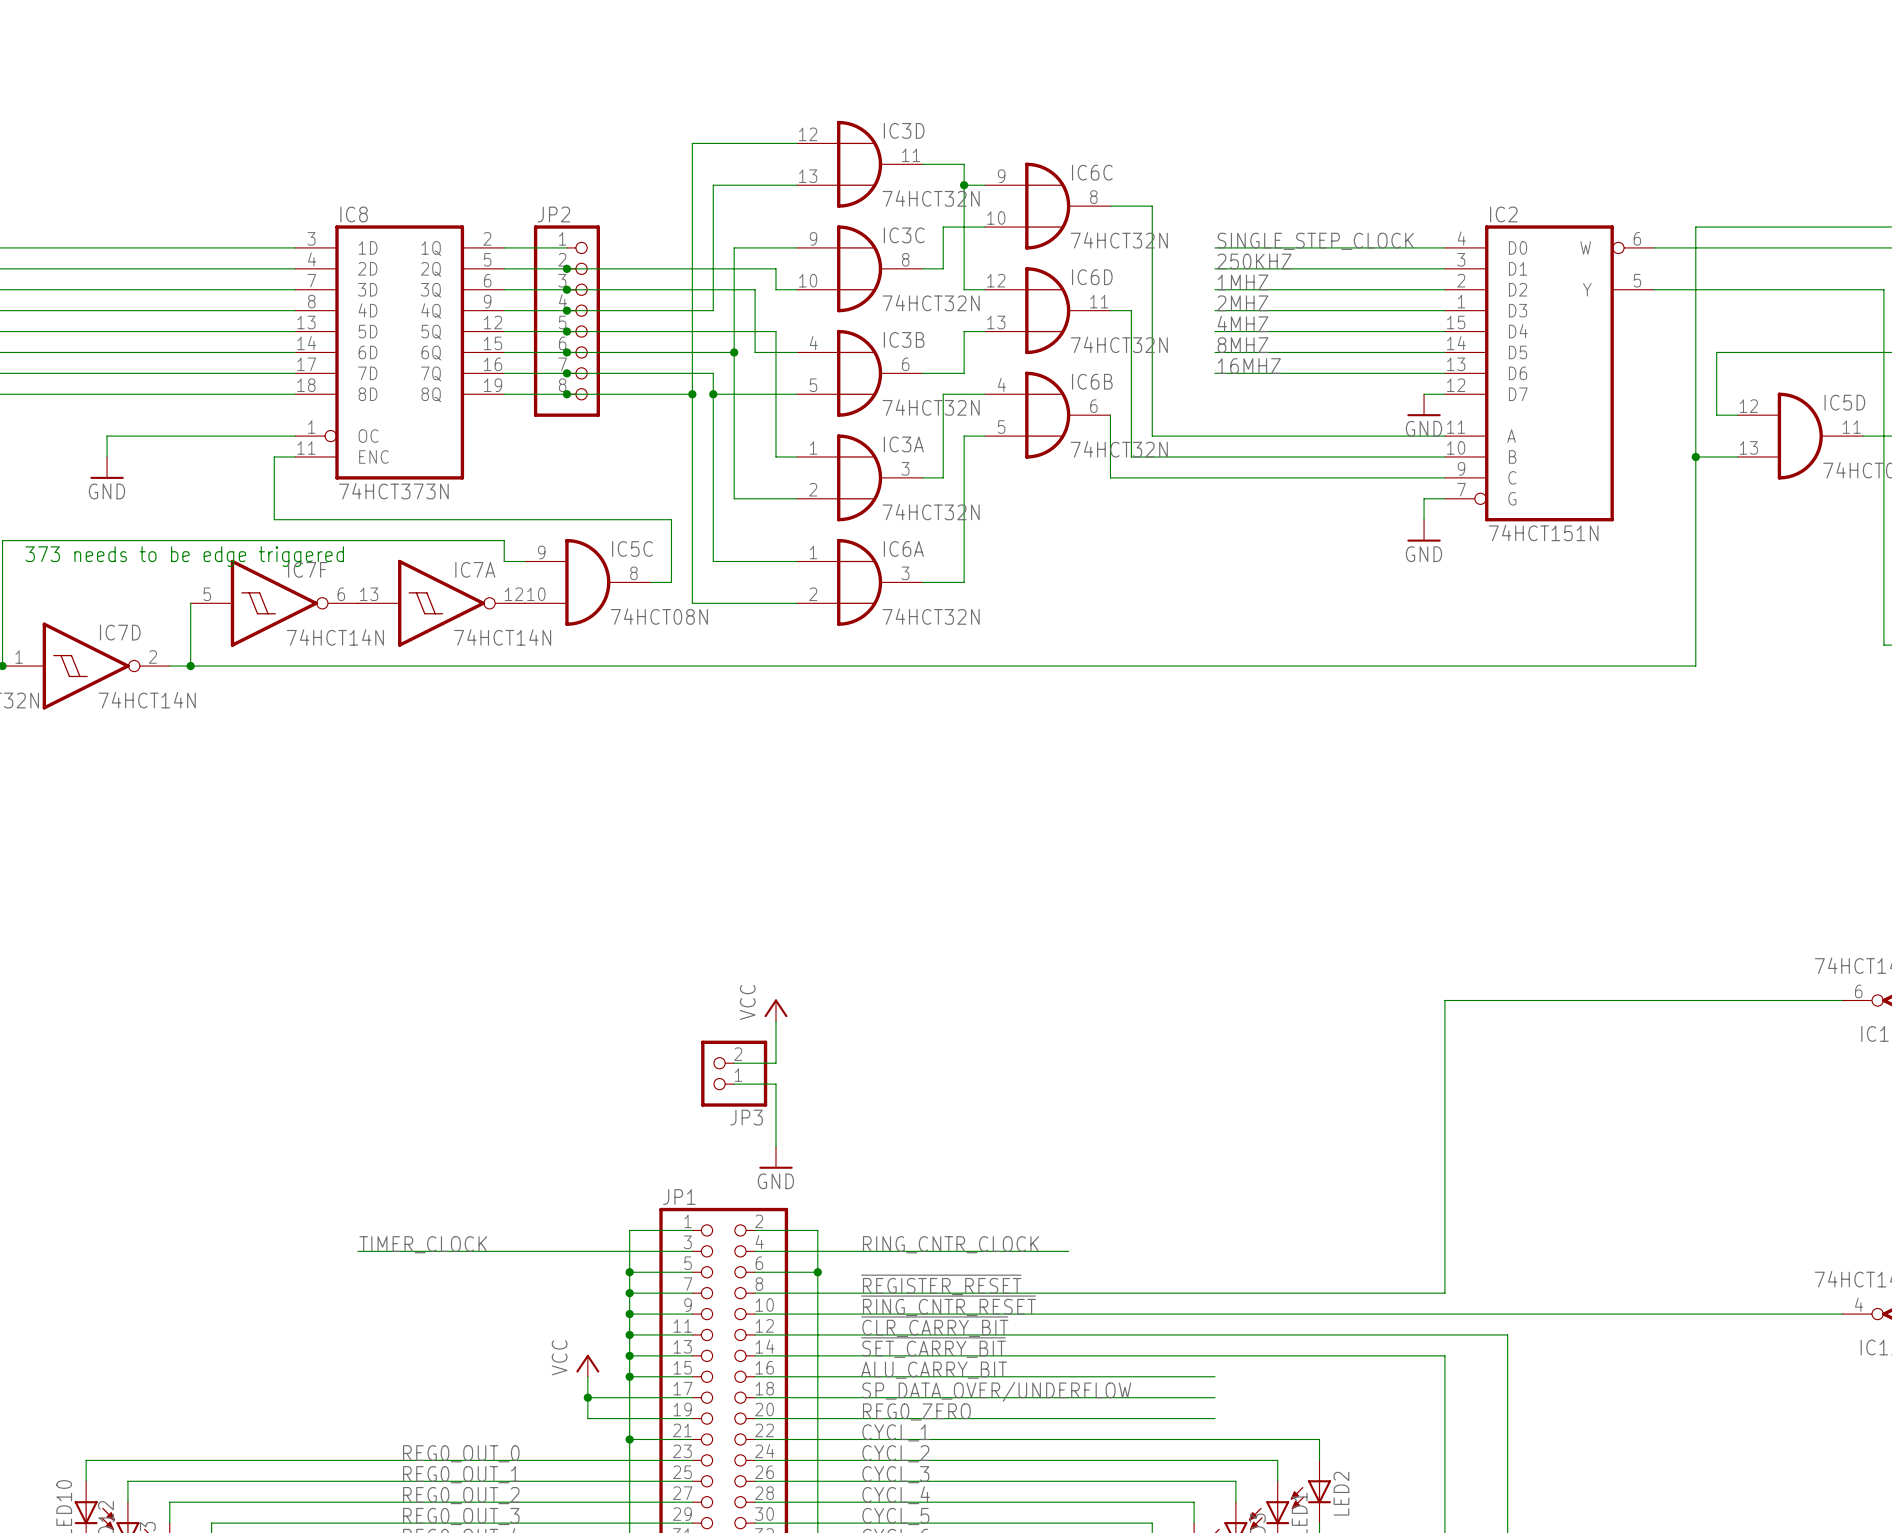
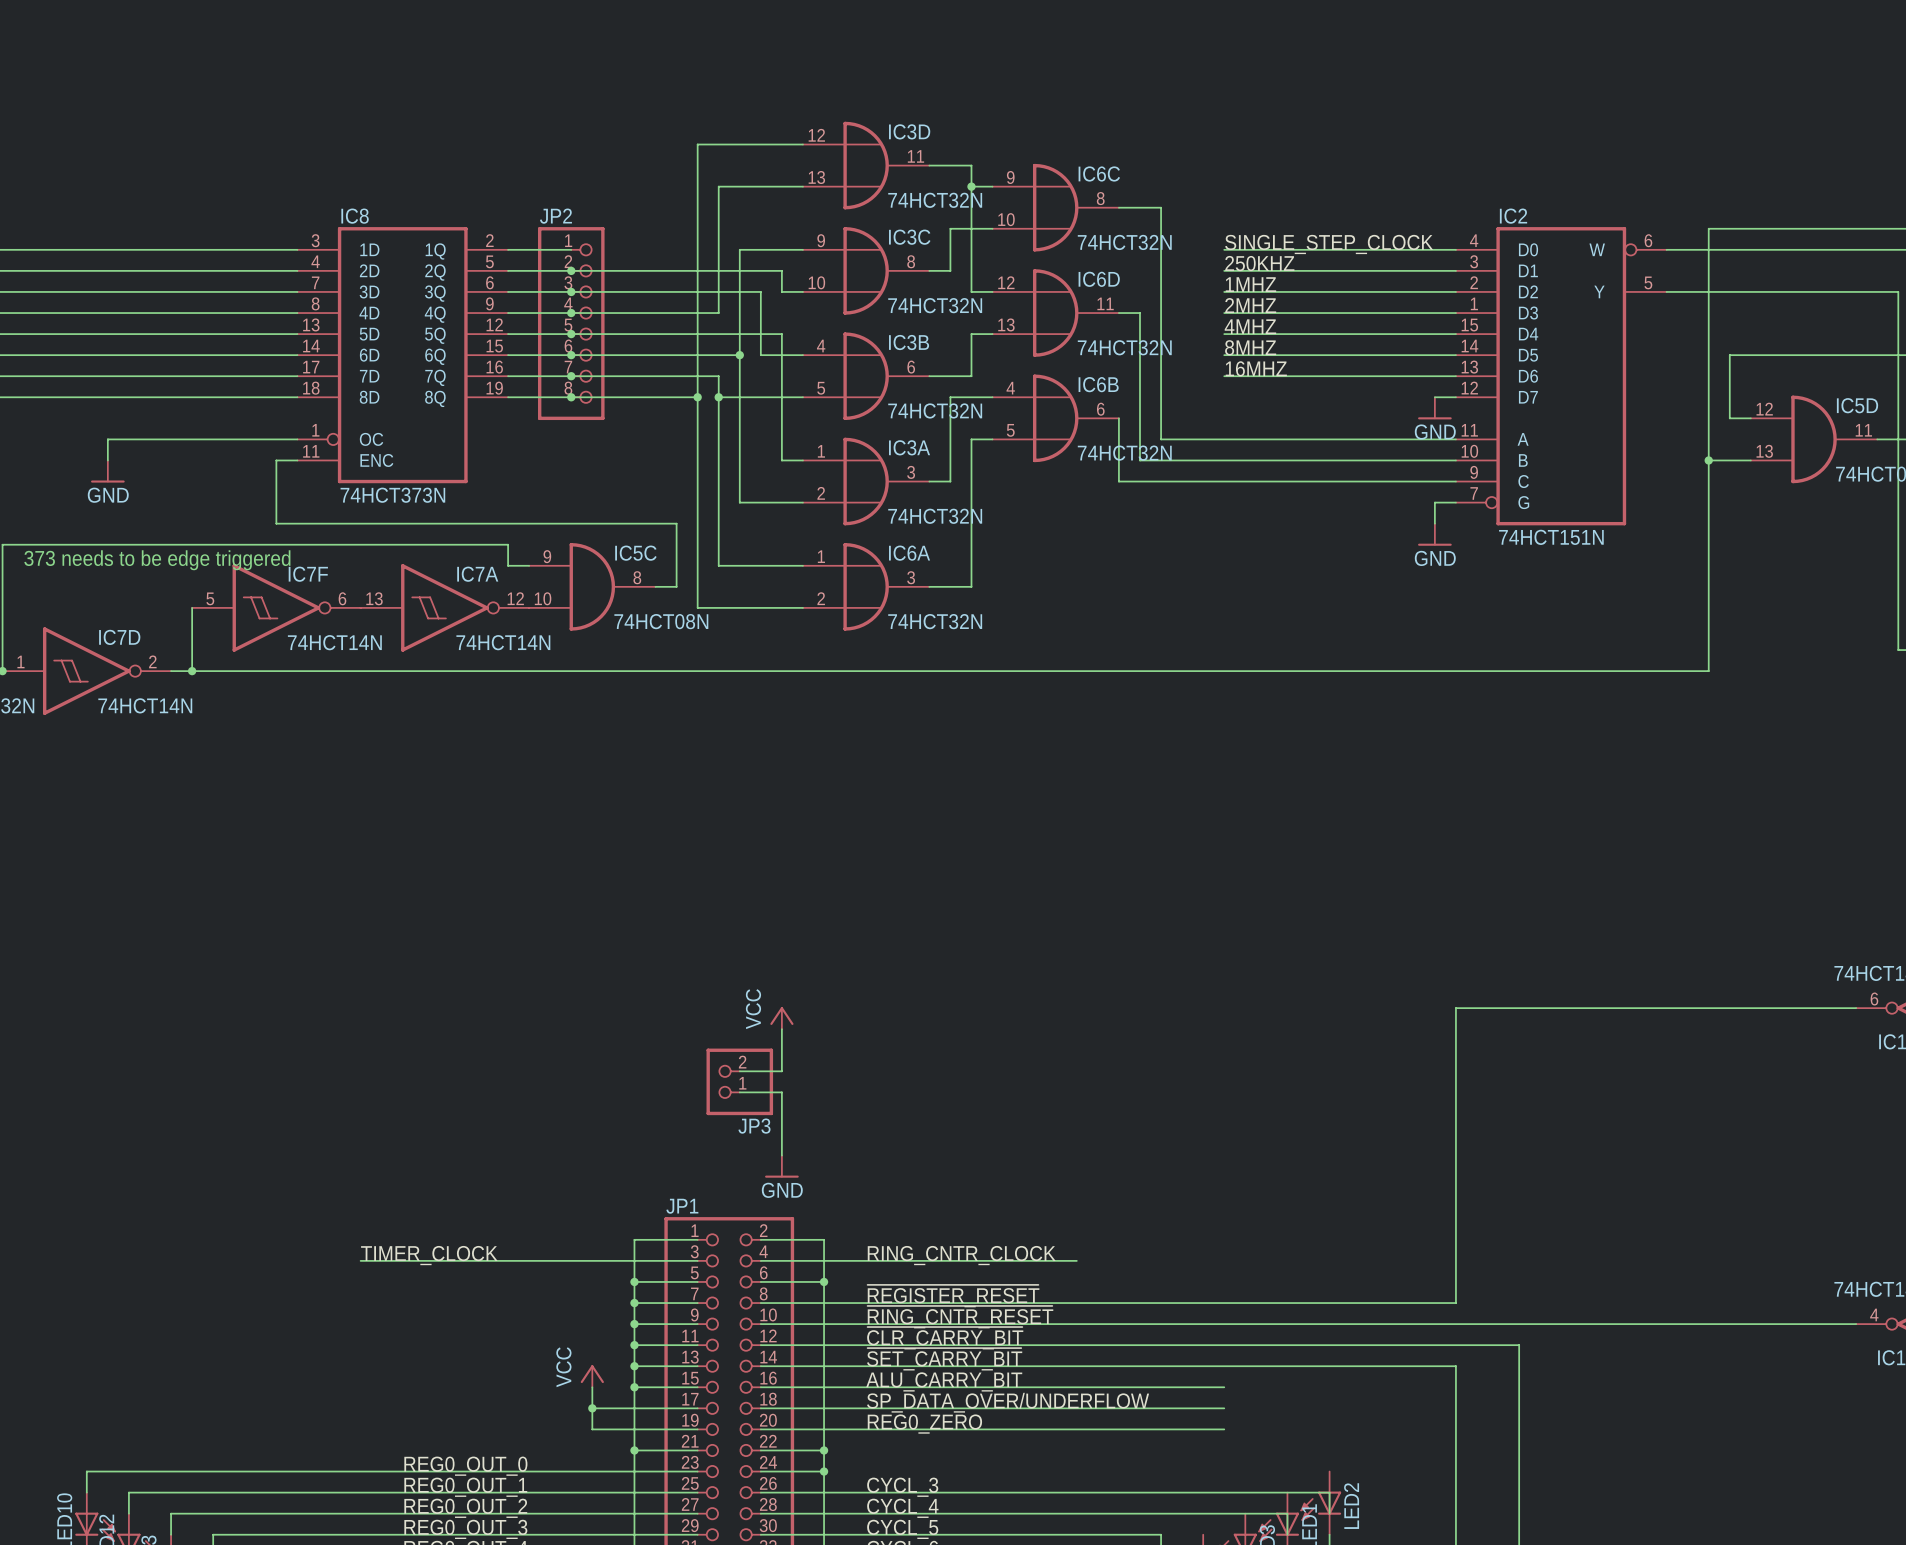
label: CYCL_1 (895, 1432) -> none
wire: (817, 1439) (1319, 1439) (1319, 1460) -> none
junction: none -> (824, 1450)
label: CYCL_2 (895, 1453) -> none
wire: (817, 1460) (1277, 1460) (1277, 1481) -> none
junction: none -> (824, 1471)
wire: (1235, 1481) (1235, 1502) -> (1245, 1492) (1329, 1492) (1329, 1513)
wire: (1194, 1502) (1194, 1523) -> (1203, 1513) (1287, 1513) (1287, 1534)

